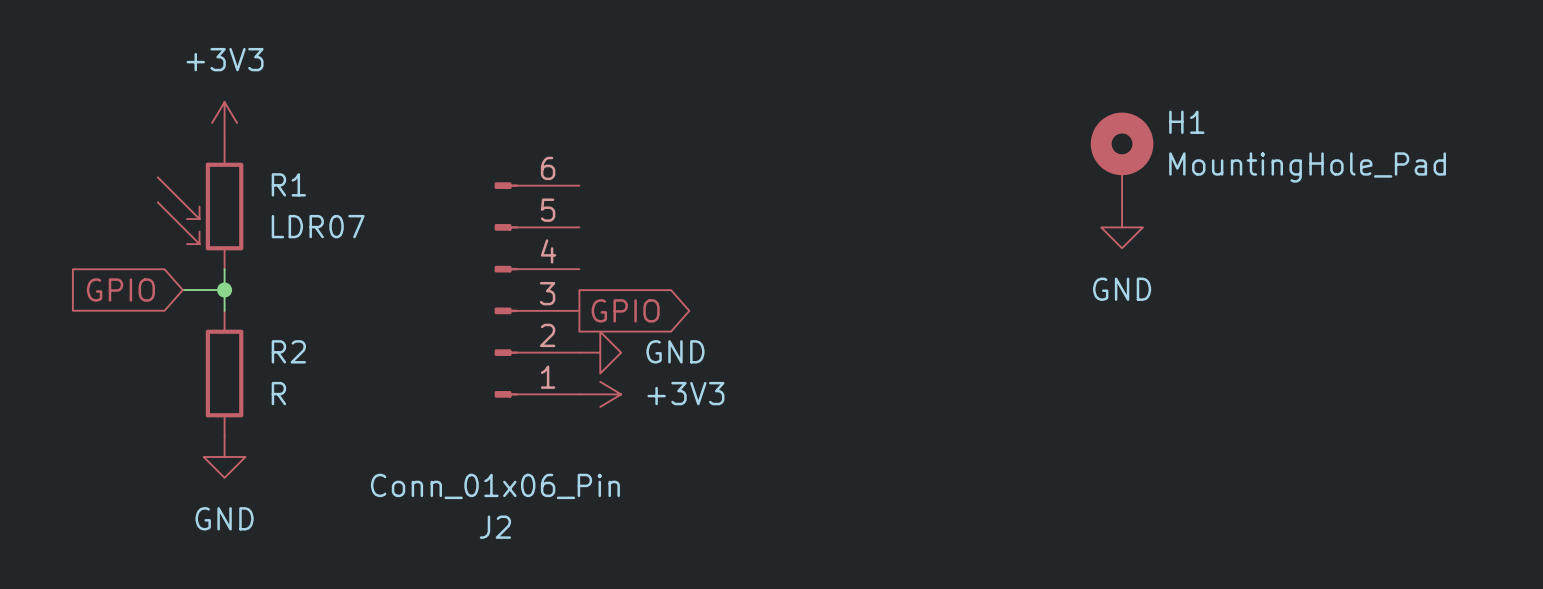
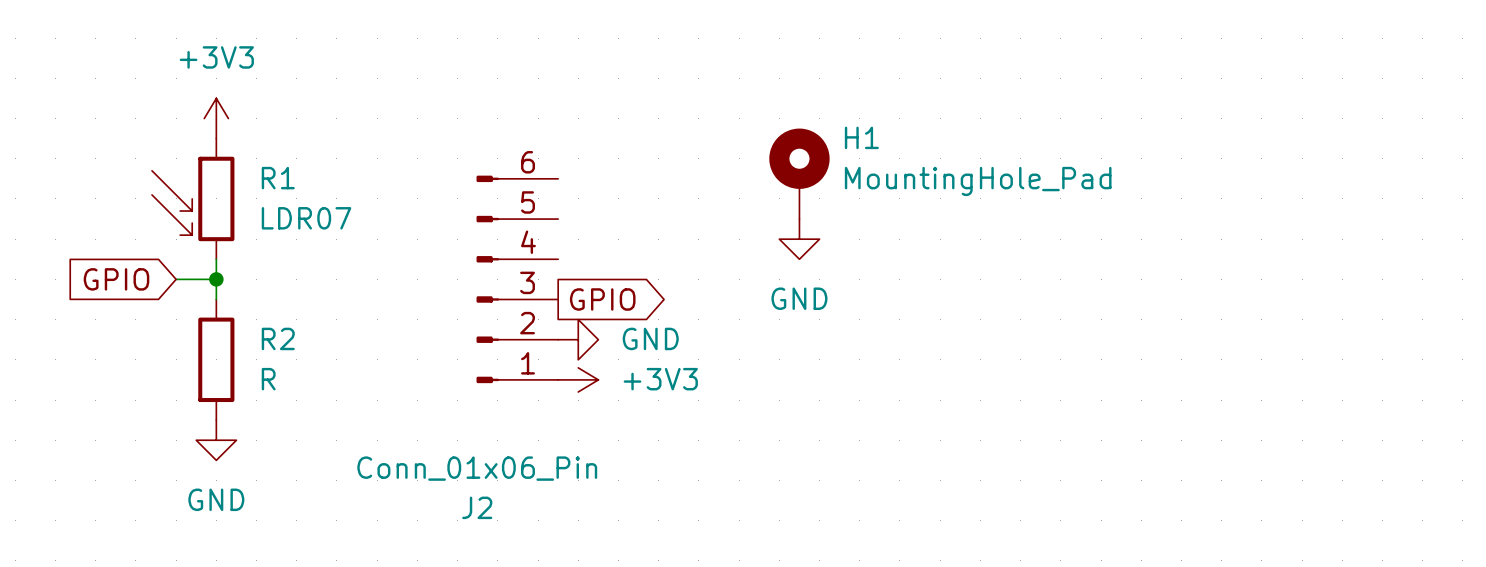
H1 position: (1122, 159) -> (799, 173)
power symbol position: GND (1122, 227) -> GND (799, 239)

